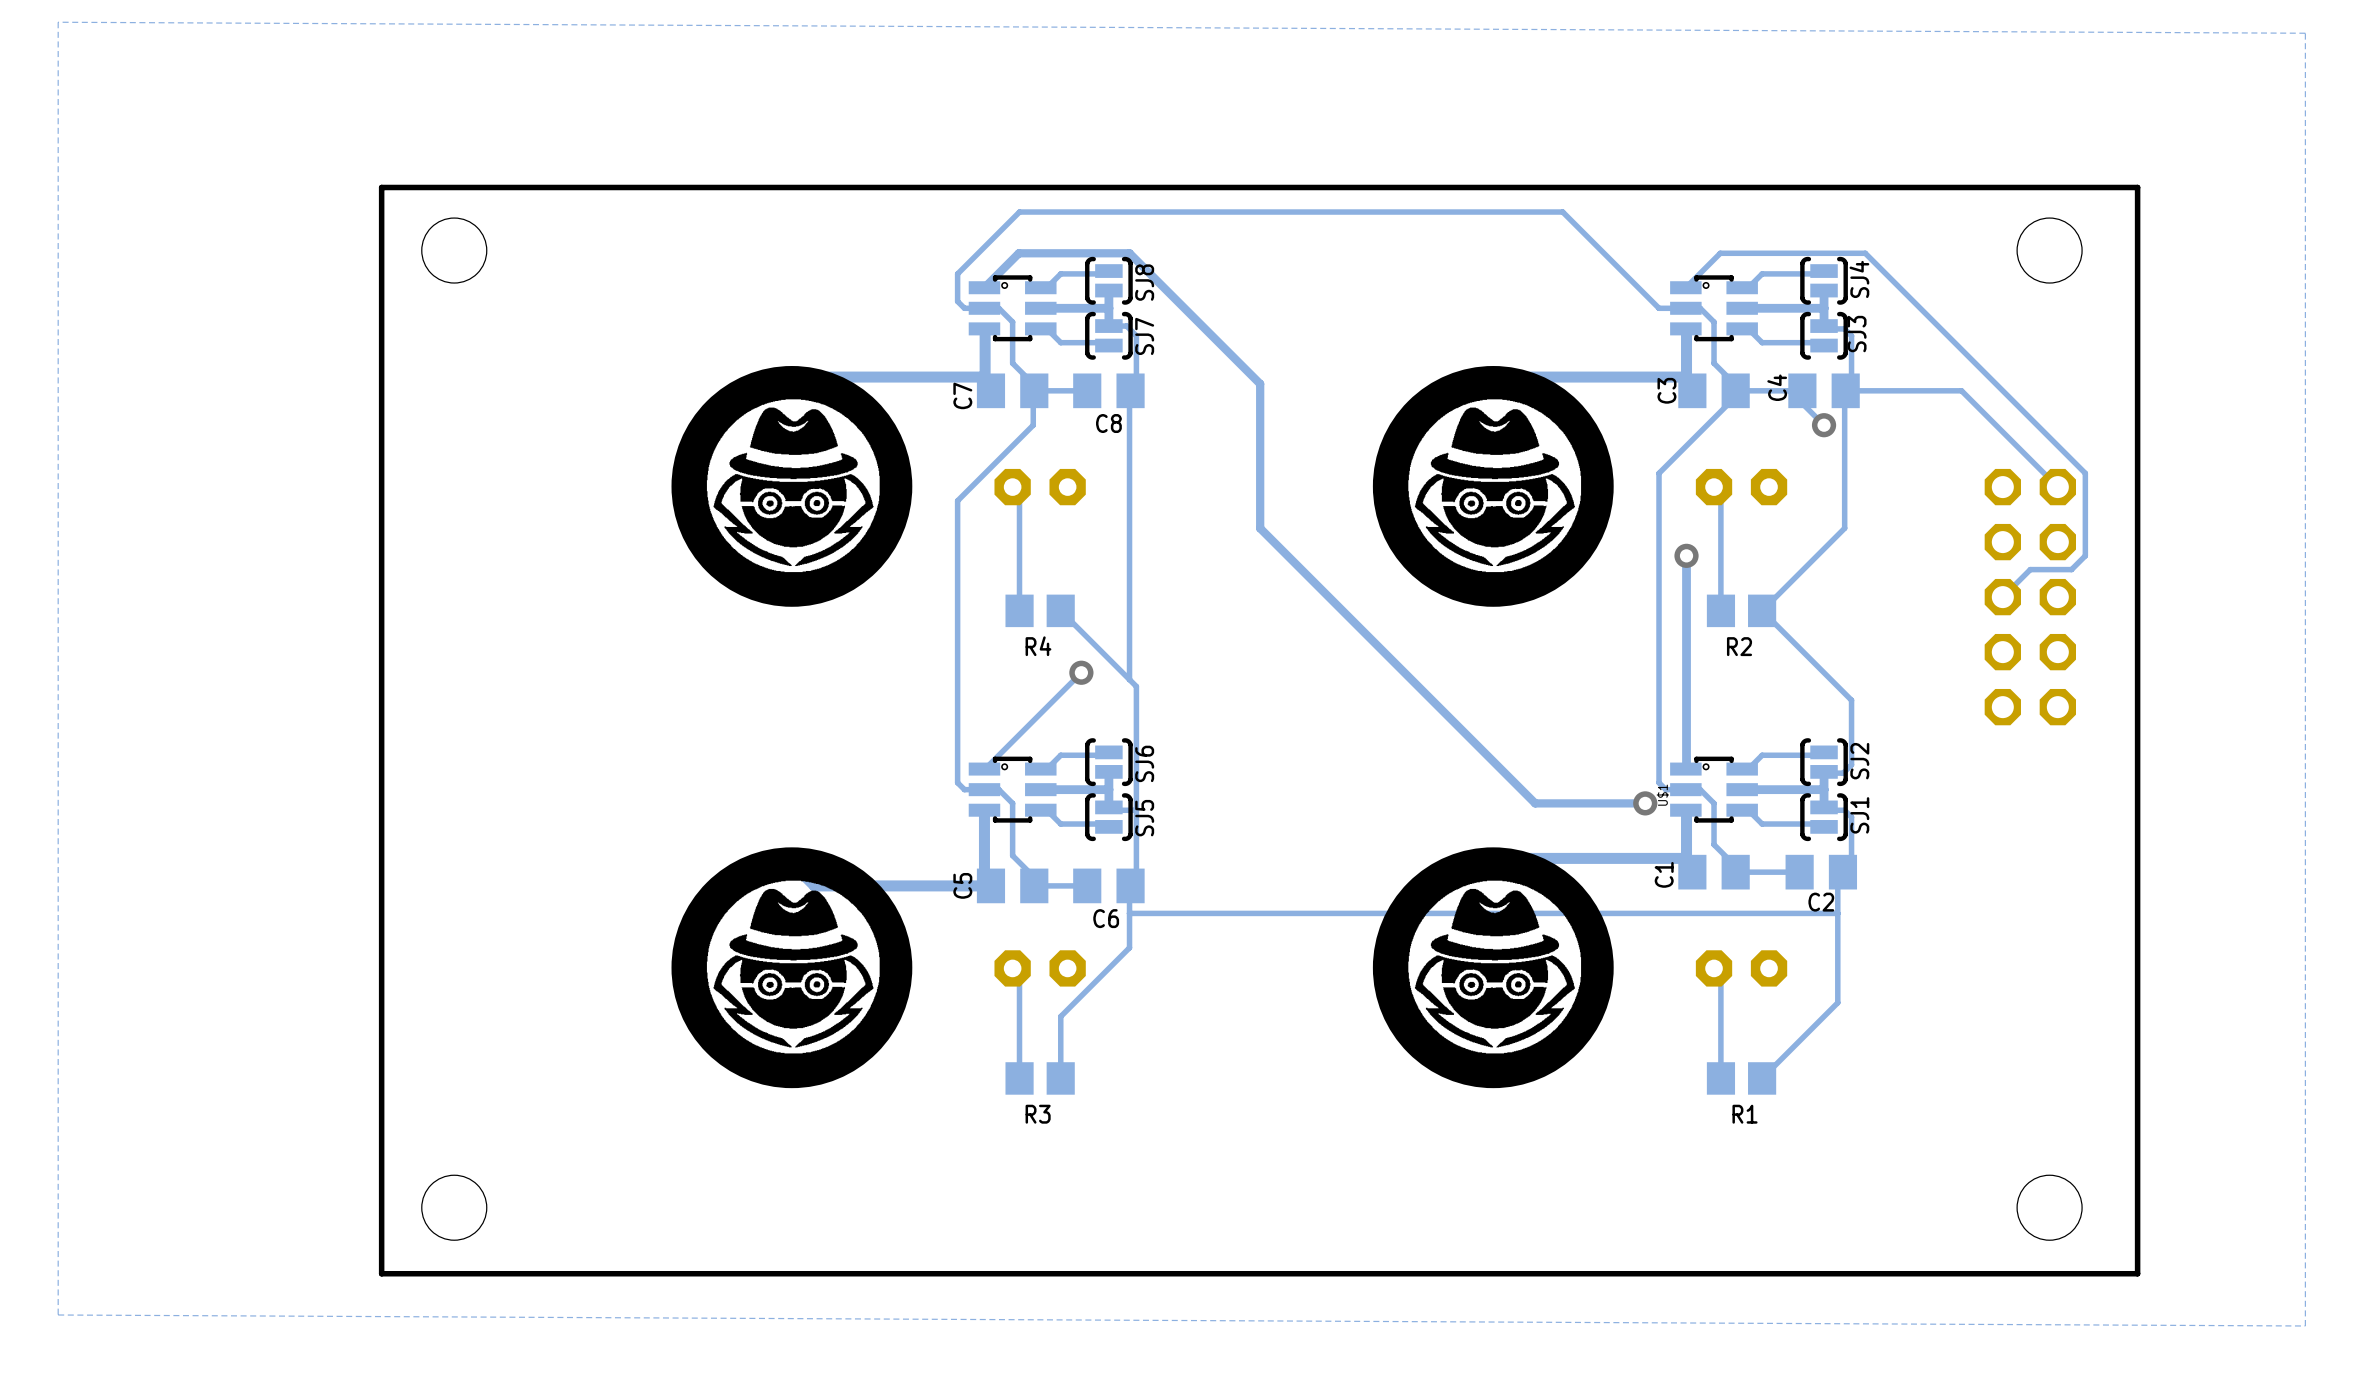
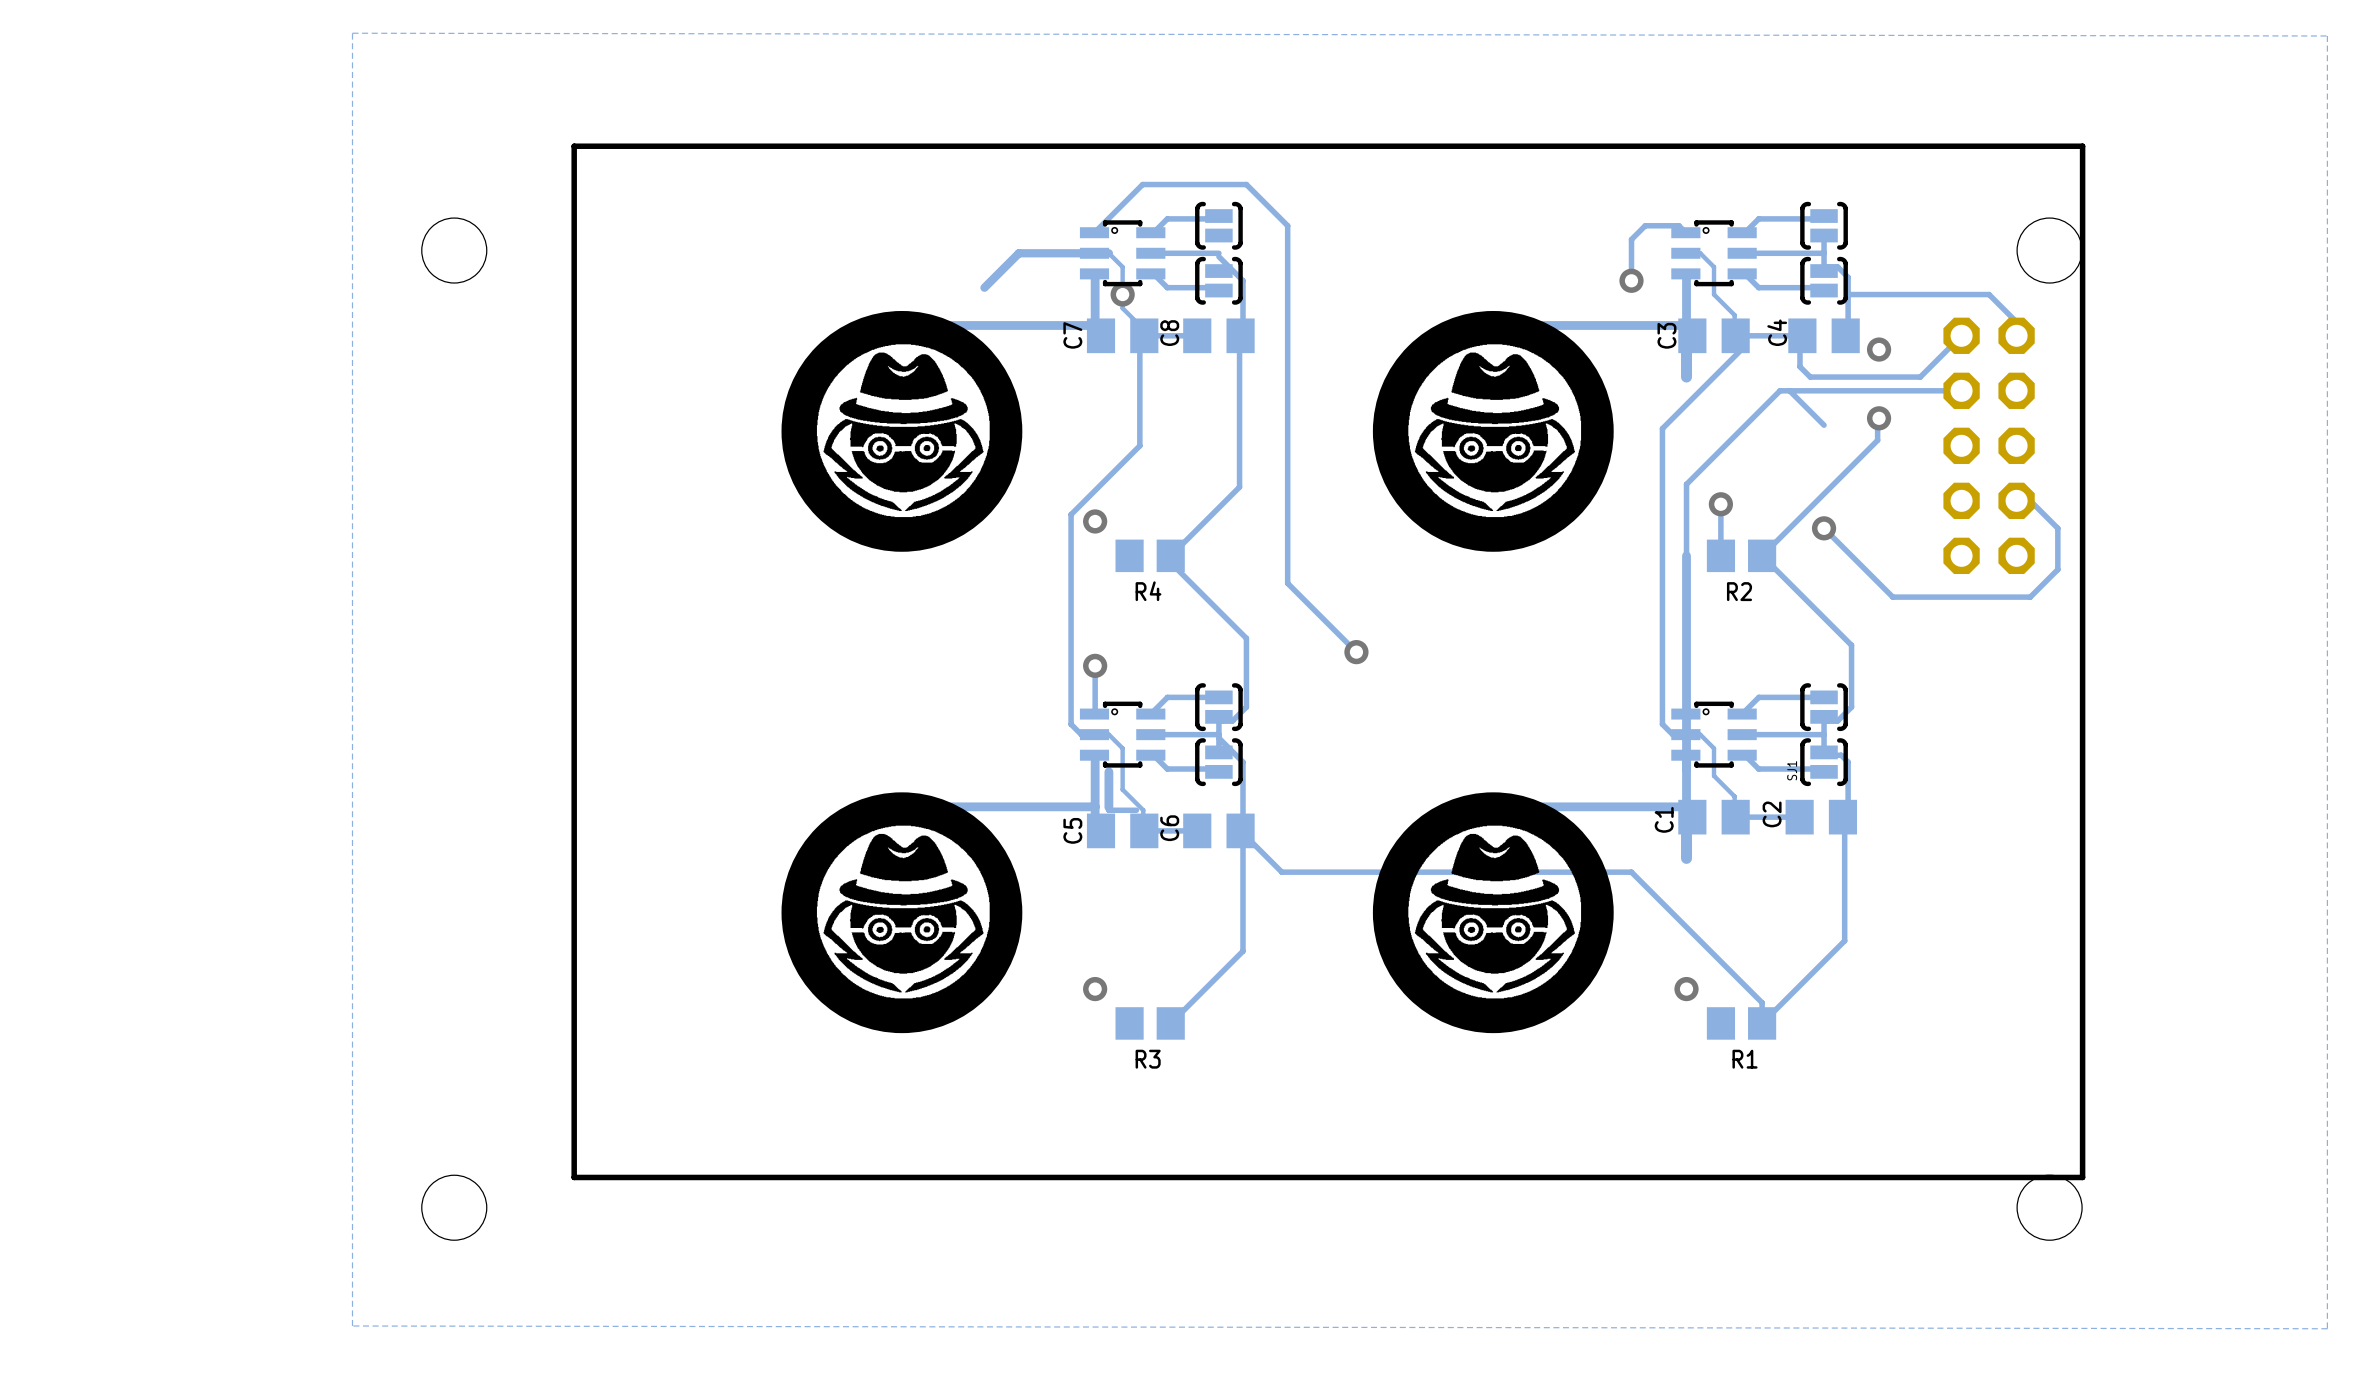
zone outline: (58, 22) (2305, 33) (2305, 1326) (58, 1315) (58, 22) -> (352, 33) (2327, 35) (2327, 1328) (352, 1326) (352, 33)
board edge: (2137, 187) (381, 187) (381, 1273) (2137, 1273) (2137, 187) -> (2082, 146) (2082, 1177) (574, 1177) (574, 146) (2082, 146)
track: none -> (1218, 216) (1218, 218) (1167, 218) (1153, 232) (1150, 232)
track: none -> (1824, 216) (1824, 218) (1758, 218) (1744, 232) (1742, 232)
part: none -> (1218, 225)
part: none -> (1824, 225)
track: none -> (1094, 232) (1142, 184) (1246, 184) (1287, 225) (1287, 583) (1356, 652)
track: none -> (1685, 232) (1678, 225) (1645, 225) (1631, 239) (1631, 280)
track: none -> (1824, 235) (1824, 271) (1828, 267) (1837, 267) (1848, 277) (1848, 335)
track: (1108, 253) (1129, 253) (1260, 383) (1260, 528) (1535, 803) (1645, 803) -> (1108, 253) (1122, 267) (1122, 308) (1136, 322) (1136, 327) (1144, 335)
part: none -> (1122, 253)
track: none -> (1685, 253) (1700, 253) (1714, 267) (1714, 294) (1734, 315) (1734, 335) (1802, 335)
part: none -> (1714, 253)
track: (1742, 253) (1720, 253) (1686, 287) -> none
track: (1824, 253) (1865, 253) (2085, 473) (2085, 555) (2071, 569) (2030, 569) (2002, 597) -> none
track: none -> (1218, 256) (1242, 280) (1242, 335) (1239, 335) (1239, 487) (1170, 555) (1170, 562) (1246, 638) (1246, 707) (1232, 720) (1222, 720) (1218, 716) (1218, 752)
track: (1108, 271) (1108, 273) (1060, 273) (1047, 287) (1040, 287) -> none
track: (1824, 271) (1824, 273) (1762, 273) (1748, 287) (1742, 287) -> none
track: none -> (1094, 273) (1095, 325)
track: none -> (1150, 273) (1153, 273) (1167, 287) (1218, 287) (1218, 290)
track: none -> (1685, 273) (1686, 325) (1493, 325) (1493, 327)
SJ4 name: SJ4 (1859, 279) -> none
SJ8: (1108, 280) -> none
part: none -> (1218, 280)
via: none -> (1631, 280)
track: (1108, 290) (1108, 326) (1126, 326) (1136, 335) (1136, 390) (1129, 390) (1129, 679) -> none
track: (1824, 290) (1824, 328) (1844, 328) (1851, 335) (1851, 390) -> (1824, 290) (1824, 287) (1758, 287) (1744, 273) (1742, 273)
via: none -> (1122, 294)
track: none -> (1848, 294) (1989, 294) (2016, 322) (2016, 335)
part: (1012, 308) -> none
track: (1108, 308) (1040, 308) -> (1218, 253) (1150, 253)
part: (1714, 308) -> none
track: (1824, 308) (1742, 308) -> none
track: none -> (1095, 325) (902, 325) (902, 327)
track: (984, 328) (985, 377) -> none
track: (1040, 328) (1047, 328) (1060, 342) (1108, 342) (1108, 345) -> none
track: (1742, 328) (1748, 328) (1762, 342) (1824, 342) (1824, 345) -> none
SJ7: (1108, 335) -> none
track: none -> (1197, 335) (1139, 335) (1139, 445) (1071, 514) (1071, 724) (1081, 734) (1108, 734) (1122, 748) (1122, 789) (1143, 810) (1143, 830) (1197, 830)
track: none -> (1735, 335) (1741, 341) (1741, 349) (1662, 428) (1662, 724) (1672, 734) (1700, 734) (1714, 748) (1714, 775) (1734, 796) (1734, 817) (1799, 817)
SJ3: (1824, 335) -> none
track: none -> (1961, 335) (1920, 377) (1810, 377) (1799, 366) (1799, 335)
via: none -> (1879, 349)
track: (985, 377) (792, 377) (792, 382) -> none
track: (1686, 377) (1493, 377) (1493, 382) -> none
C7 position: (1012, 390) -> (1122, 335)
track: (1040, 390) (1012, 363) (1012, 322) (998, 308) (964, 308) (957, 301) (957, 273) (1019, 212) (1562, 212) (1659, 308) (1700, 308) (1714, 322) (1714, 363) (1741, 390) (1659, 473) (1659, 782) (1665, 789) (1700, 789) (1714, 803) (1714, 844) (1741, 872) -> none
track: (1087, 390) (1033, 390) (1033, 425) (957, 500) (957, 782) (964, 789) (998, 789) (1012, 803) (1012, 855) (1029, 872) (1029, 880) (1034, 885) (1087, 885) -> none
C8 position: (1108, 390) -> (1218, 335)
C3 position: (1714, 390) -> (1714, 335)
track: (1780, 390) (1735, 390) -> (1780, 390) (1686, 484) (1686, 555)
C4 position: (1824, 390) -> (1824, 335)
track: (1844, 390) (1844, 528) (1762, 610) (1851, 700) -> (1879, 418) (1877, 440) (1762, 555) (1851, 645) (1851, 700)
track: none -> (1844, 390) (1802, 390)
track: (1961, 390) (2057, 487) -> none
C7 name position: C7 (962, 395) -> C7 (1072, 335)
via: none -> (1879, 418)
C8 name rotation: 0° (1108, 423) -> 90° counterclockwise (1169, 333)
C8 name position: C8 (1108, 423) -> C8 (1169, 333)
via: (1824, 425) -> none
part position: (791, 486) -> (901, 431)
part position: (1493, 486) -> (1493, 431)
track: (1012, 487) (1019, 493) (1019, 610) -> none
part: (1040, 487) -> none
part: (1741, 487) -> none
track: none -> (2016, 500) (2030, 500) (2057, 528) (2057, 569) (2030, 597) (1892, 597) (1824, 528)
via: none -> (1095, 521)
via: none -> (1824, 528)
via position: (1686, 555) -> (1720, 504)
track: (1720, 555) (1720, 610) -> none
part position: (2030, 597) -> (1989, 445)
R4 position: (1040, 610) -> (1150, 555)
track: (1060, 610) (1136, 686) (1136, 885) (1129, 885) (1129, 947) (1060, 1016) (1060, 1078) -> none
R2 position: (1741, 610) -> (1741, 555)
via: none -> (1356, 652)
track: none -> (1095, 665) (1095, 714)
track: (1081, 672) (984, 769) -> none
via position: (1081, 672) -> (1095, 665)
track: none -> (1218, 697) (1167, 697) (1150, 714)
track: none -> (1824, 697) (1758, 697) (1742, 714)
part: none -> (1218, 707)
part: none -> (1824, 707)
track: (1851, 707) (1851, 764) (1843, 773) (1824, 771) (1824, 810) (1844, 810) (1851, 817) (1851, 865) (1844, 872) (1837, 872) (1837, 1002) (1762, 1078) -> (1851, 707) (1837, 720) (1828, 720) (1824, 716) (1824, 752)
part: none -> (1122, 734)
part: none -> (1714, 734)
track: none -> (1218, 738) (1242, 762) (1242, 951) (1170, 1023) (1163, 1016)
track: (1108, 752) (1108, 755) (1060, 755) (1047, 769) (1040, 769) -> none
track: none -> (1094, 755) (1095, 827) (1100, 830)
track: none -> (1150, 755) (1153, 755) (1167, 769) (1218, 769) (1218, 771)
track: none -> (1685, 755) (1686, 806) (1493, 806) (1493, 808)
track: none -> (1742, 755) (1744, 755) (1758, 769) (1824, 769)
track: (1824, 755) (1762, 755) (1748, 769) (1742, 769) -> (1824, 755) (1841, 755) (1848, 762) (1848, 813) (1844, 817)
SJ2 name: SJ2 (1859, 761) -> SJ1 (1792, 770)
SJ6: (1108, 762) -> none
part: none -> (1218, 762)
part: (1012, 789) -> none
track: (1108, 789) (1040, 789) -> (1218, 734) (1150, 734)
U$1: (1714, 789) -> none
track: (1824, 789) (1742, 789) -> (1824, 734) (1742, 734)
via: (1645, 803) -> none
track: none -> (1095, 806) (902, 806) (902, 808)
track: (984, 810) (984, 879) (990, 885) (814, 885) (792, 863) -> none
track: (1040, 810) (1047, 810) (1060, 824) (1108, 824) (1108, 826) -> none
track: (1742, 810) (1748, 810) (1762, 824) (1824, 824) (1824, 826) -> none
SJ5: (1108, 817) -> none
SJ1: (1824, 817) -> none
track: none -> (1844, 817) (1844, 940) (1762, 1023) (1762, 1002) (1631, 872) (1281, 872) (1240, 830)
track: (1686, 858) (1493, 858) (1493, 863) -> none
C1 position: (1714, 872) -> (1714, 817)
track: (1799, 872) (1735, 872) -> none
C2 position: (1821, 872) -> (1821, 817)
C5 position: (1012, 885) -> (1122, 830)
C6 position: (1108, 885) -> (1218, 830)
C2 name rotation: 0° (1821, 902) -> 90° counterclockwise (1772, 814)
C2 name position: C2 (1821, 902) -> C2 (1772, 814)
track: (1837, 913) (1129, 913) -> none
C6 name rotation: 0° (1106, 918) -> 90° counterclockwise (1169, 828)
C6 name position: C6 (1106, 918) -> C6 (1169, 828)
part position: (791, 967) -> (901, 912)
part position: (1493, 967) -> (1493, 912)
track: (1012, 968) (1019, 975) (1019, 1078) -> none
part: (1040, 968) -> none
track: (1714, 968) (1720, 975) (1720, 1078) -> none
part: (1741, 968) -> none
via: none -> (1095, 989)
via: none -> (1686, 989)
R3 position: (1040, 1078) -> (1150, 1023)
R1 position: (1741, 1078) -> (1741, 1023)

